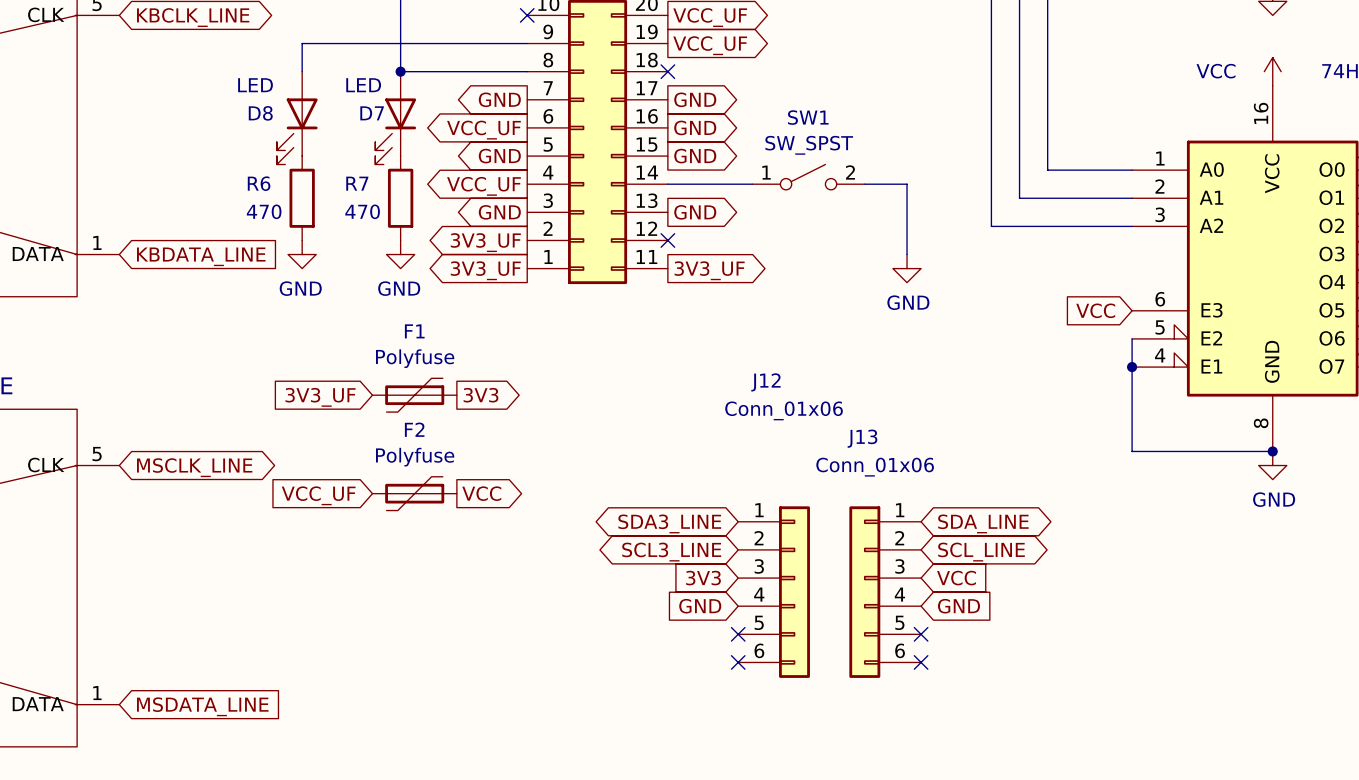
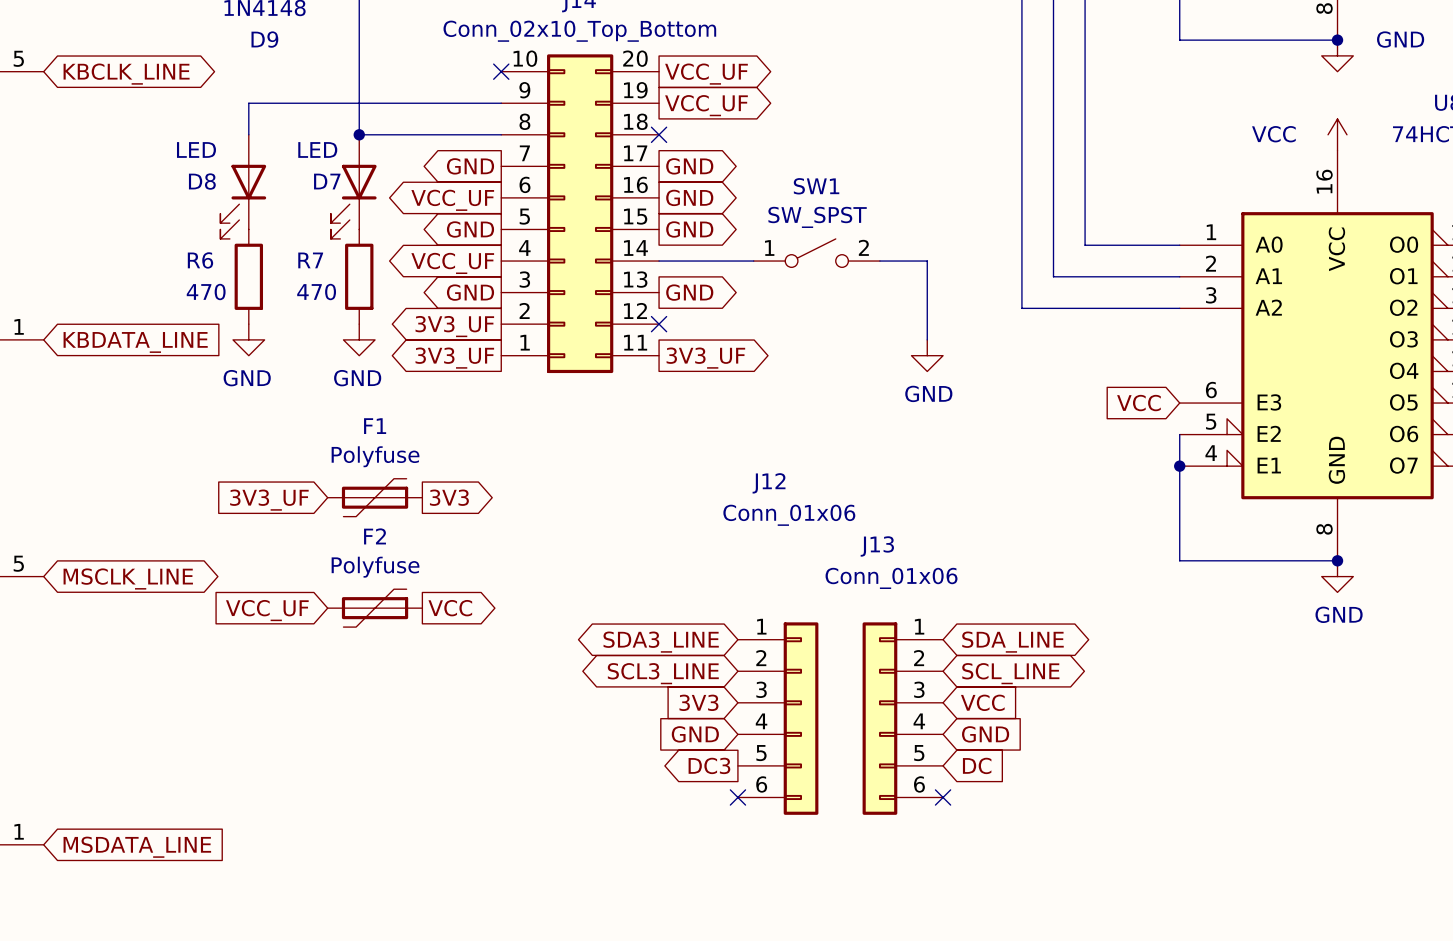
global label: none -> DC3 (709, 765)
no-connect mark: (738, 634) -> none
no-connect mark: (921, 634) -> none
global label: none -> DC (977, 765)

